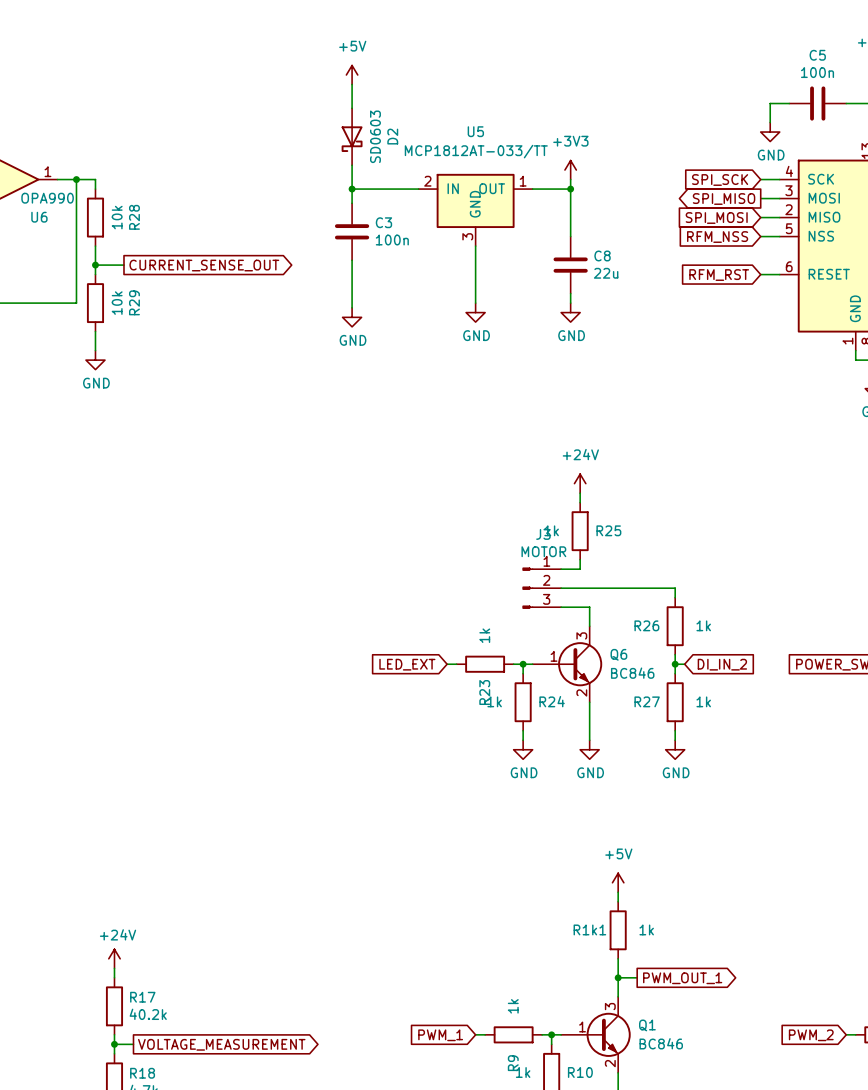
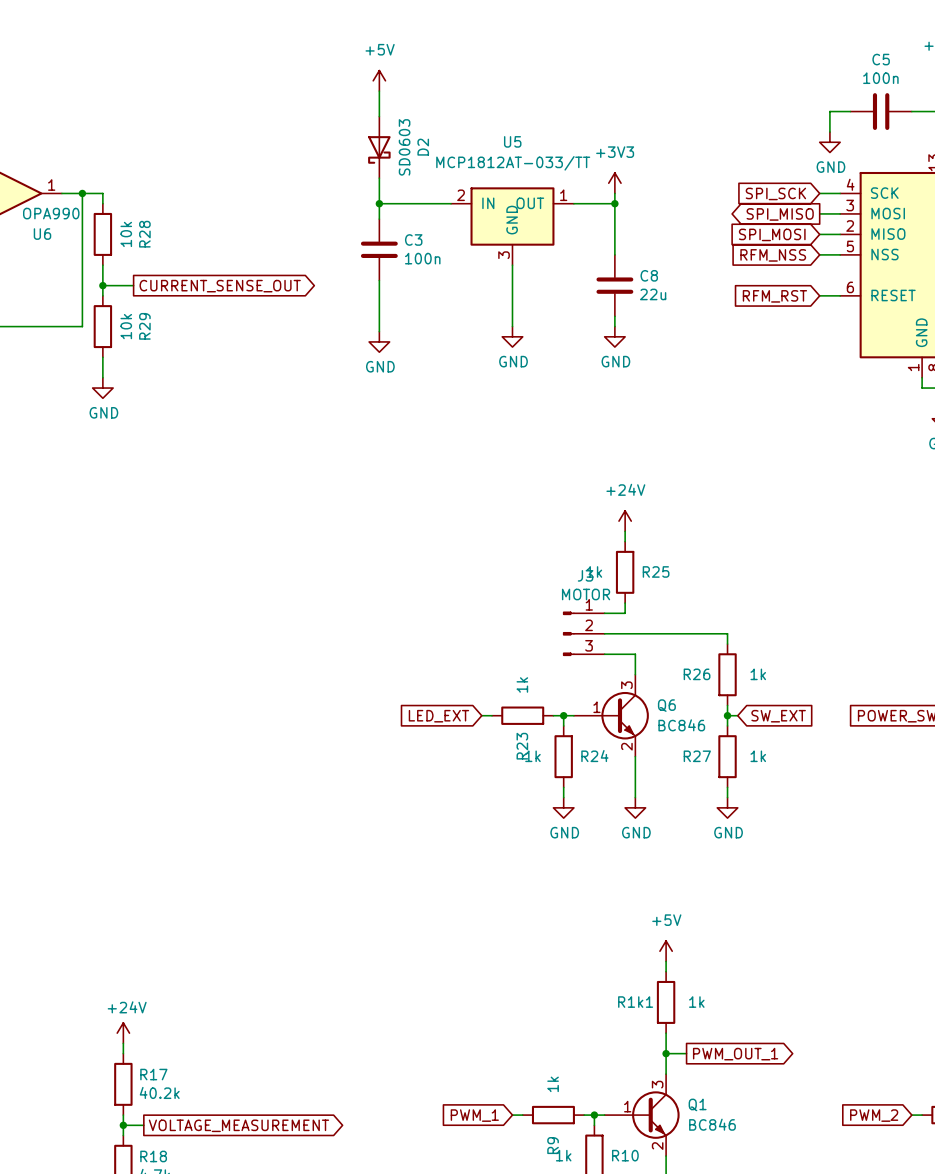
global label: DI_IN_2 (722, 664) -> SW_EXT (778, 716)

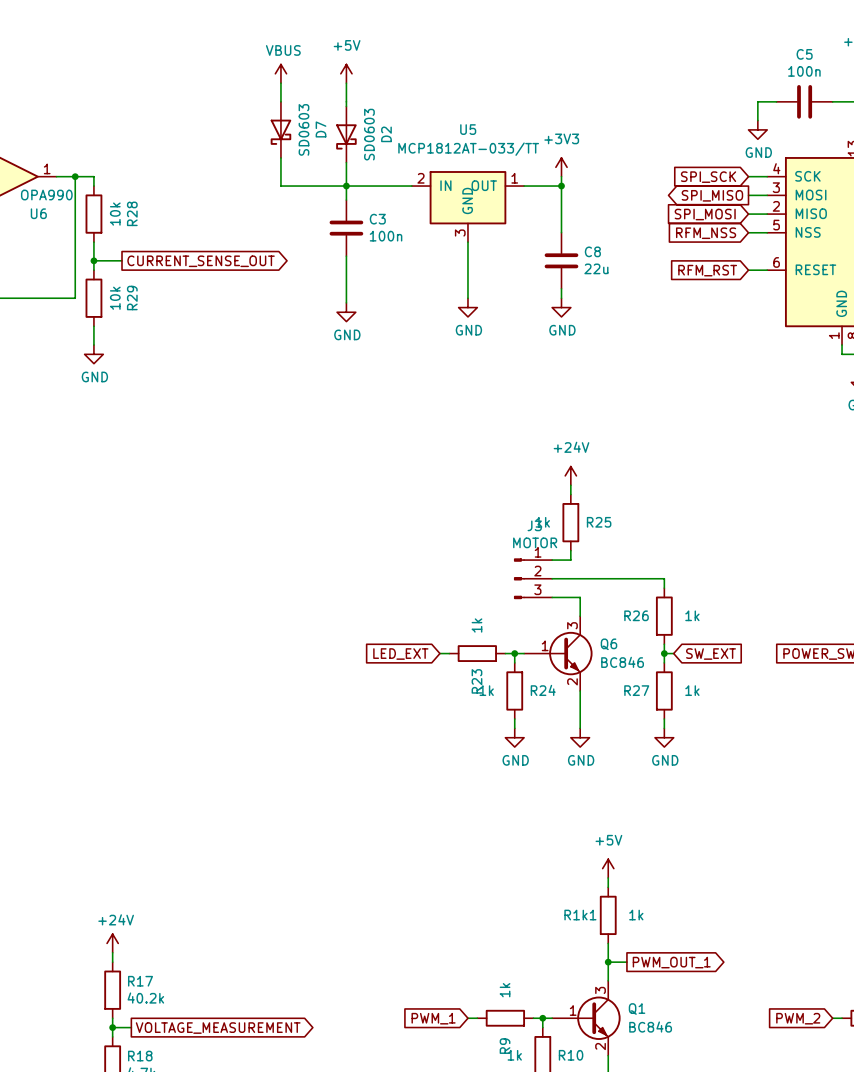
power symbol: none -> VBUS (280, 73)
wire: none -> (280, 83) (280, 101)
D7: none -> SD0603 (280, 129)
wire: none -> (280, 157) (280, 186) (346, 186)

